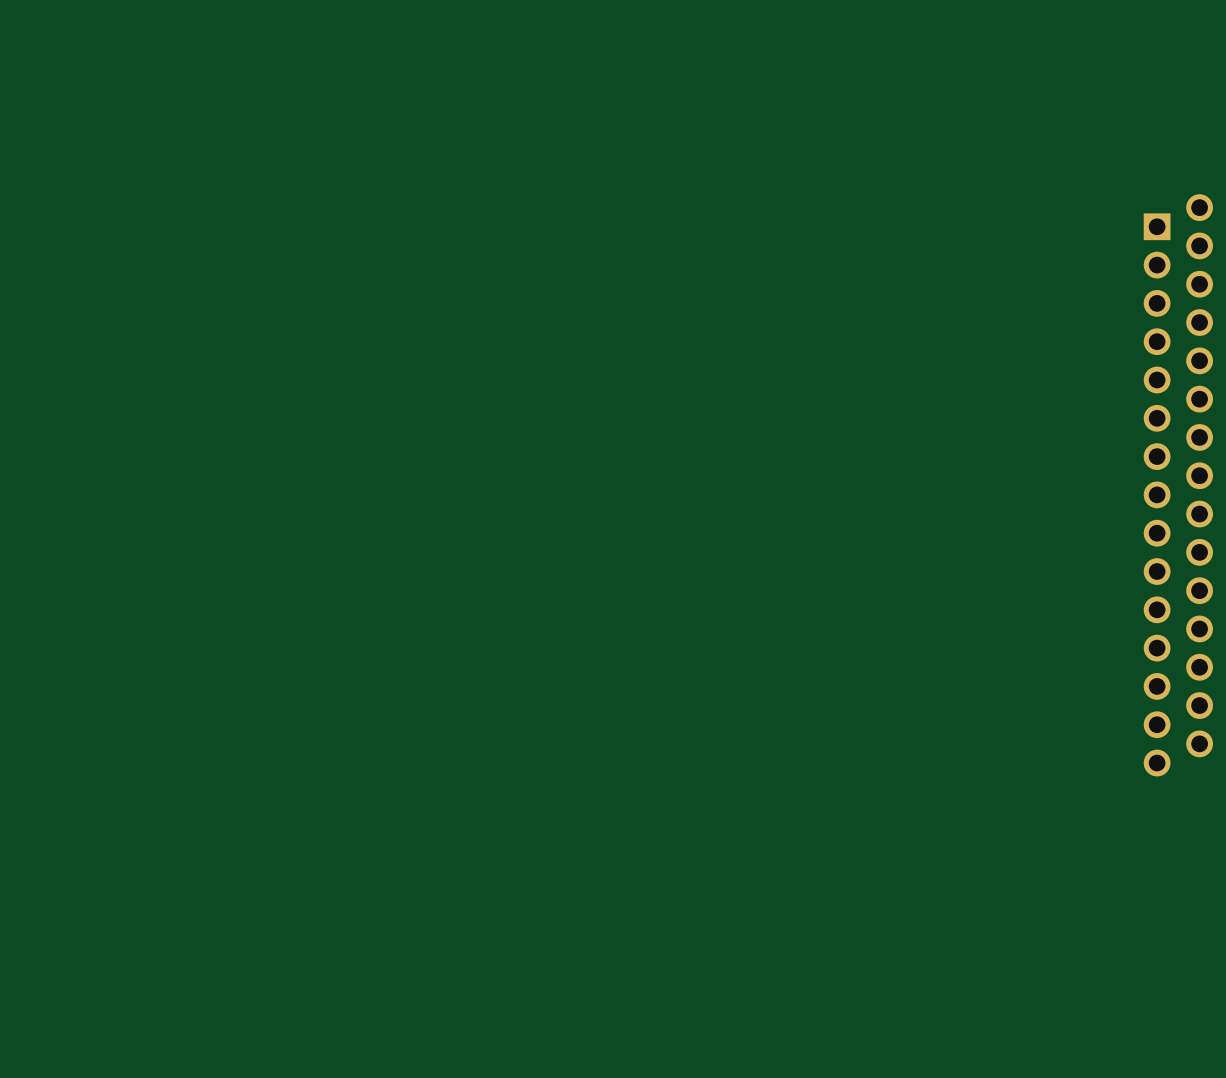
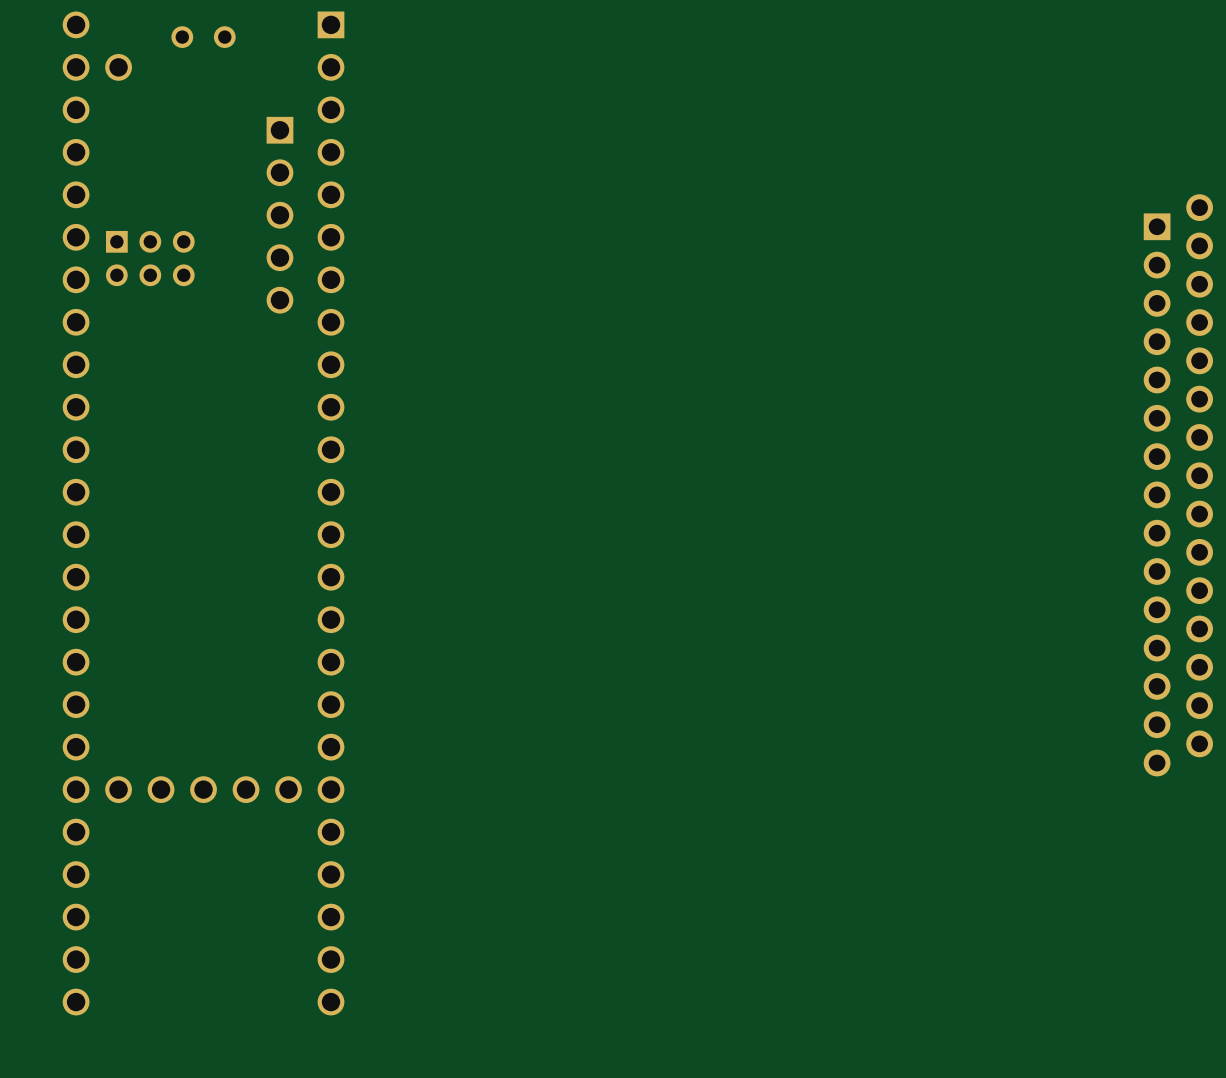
part: none -> (203, 513)

